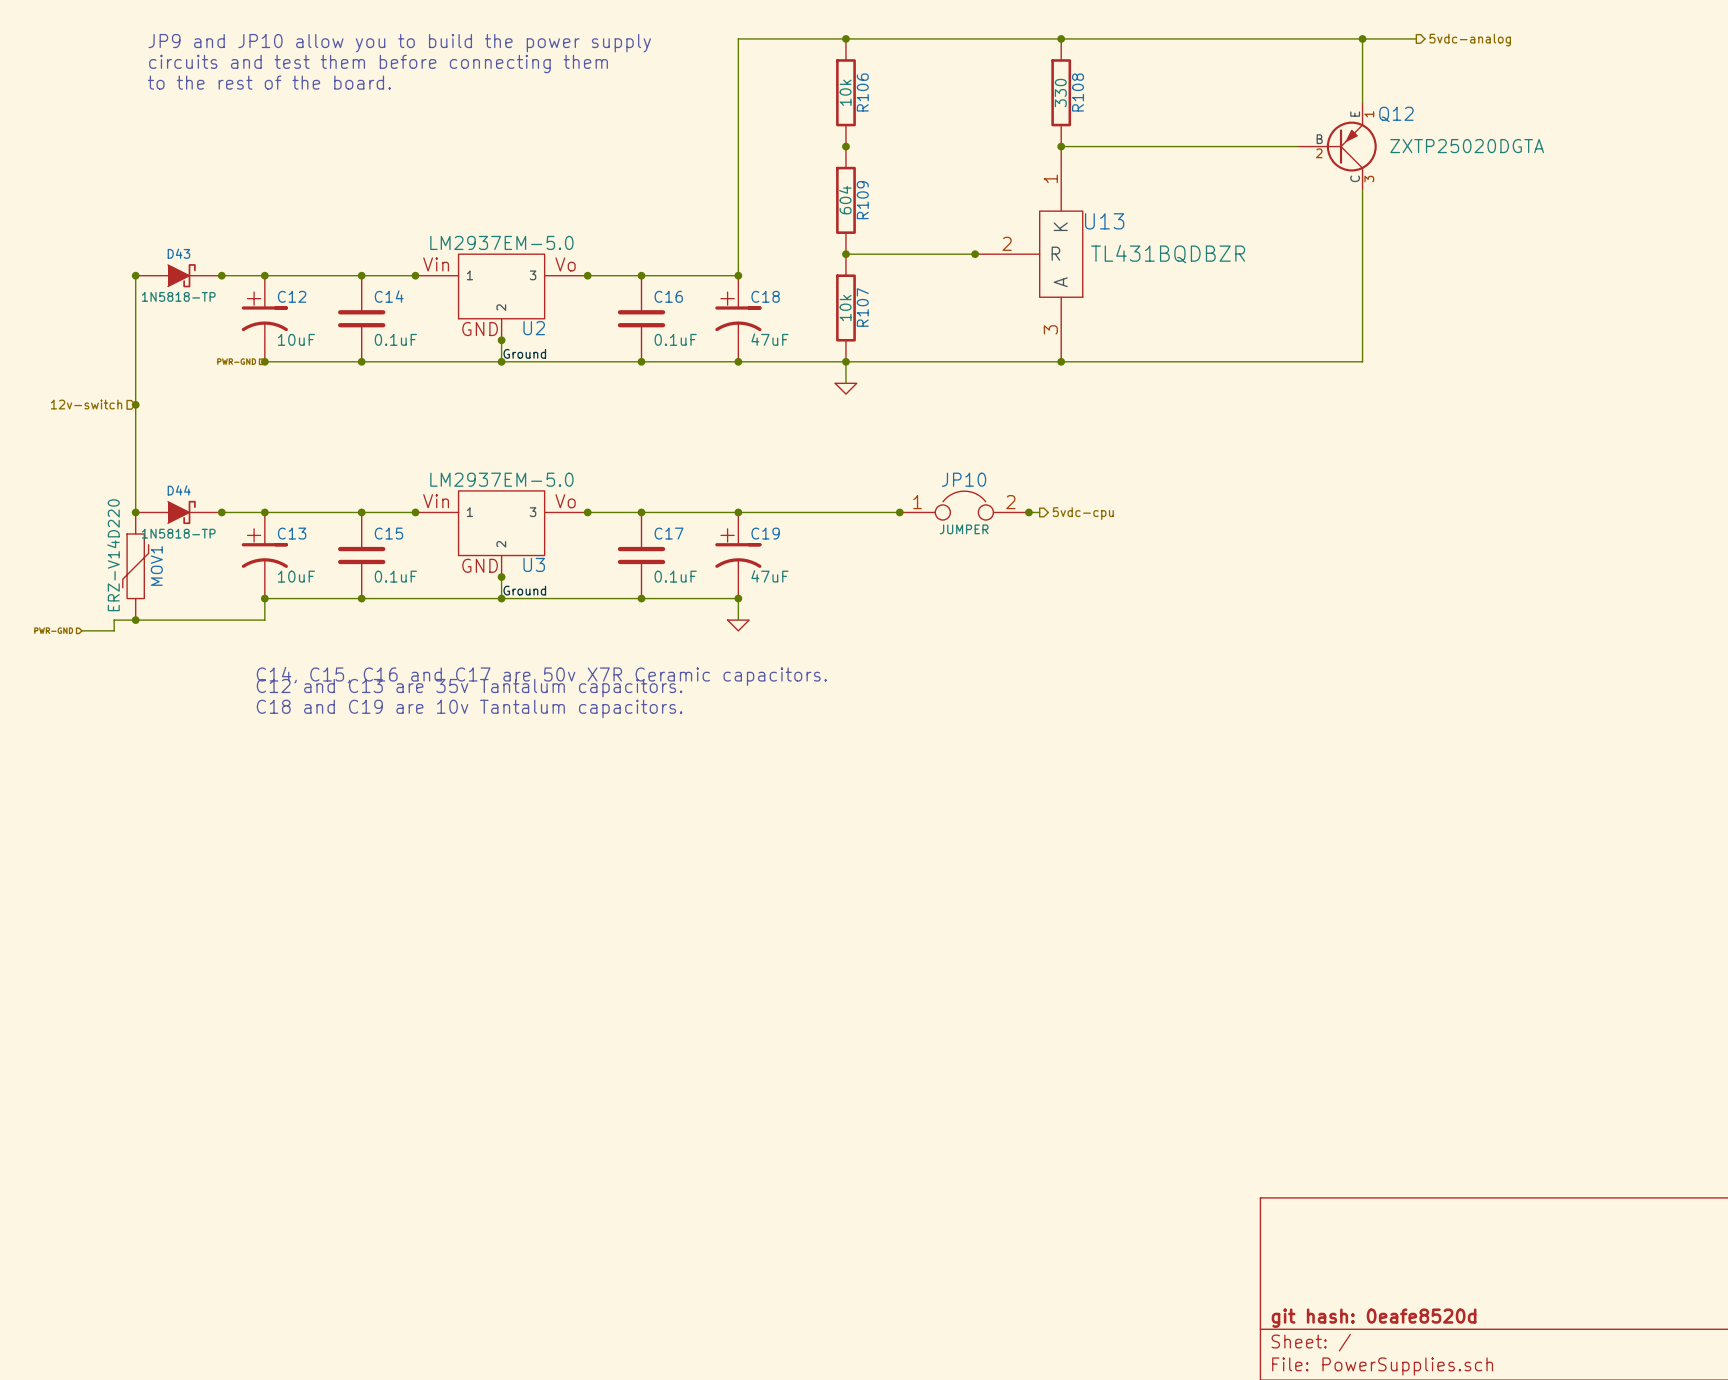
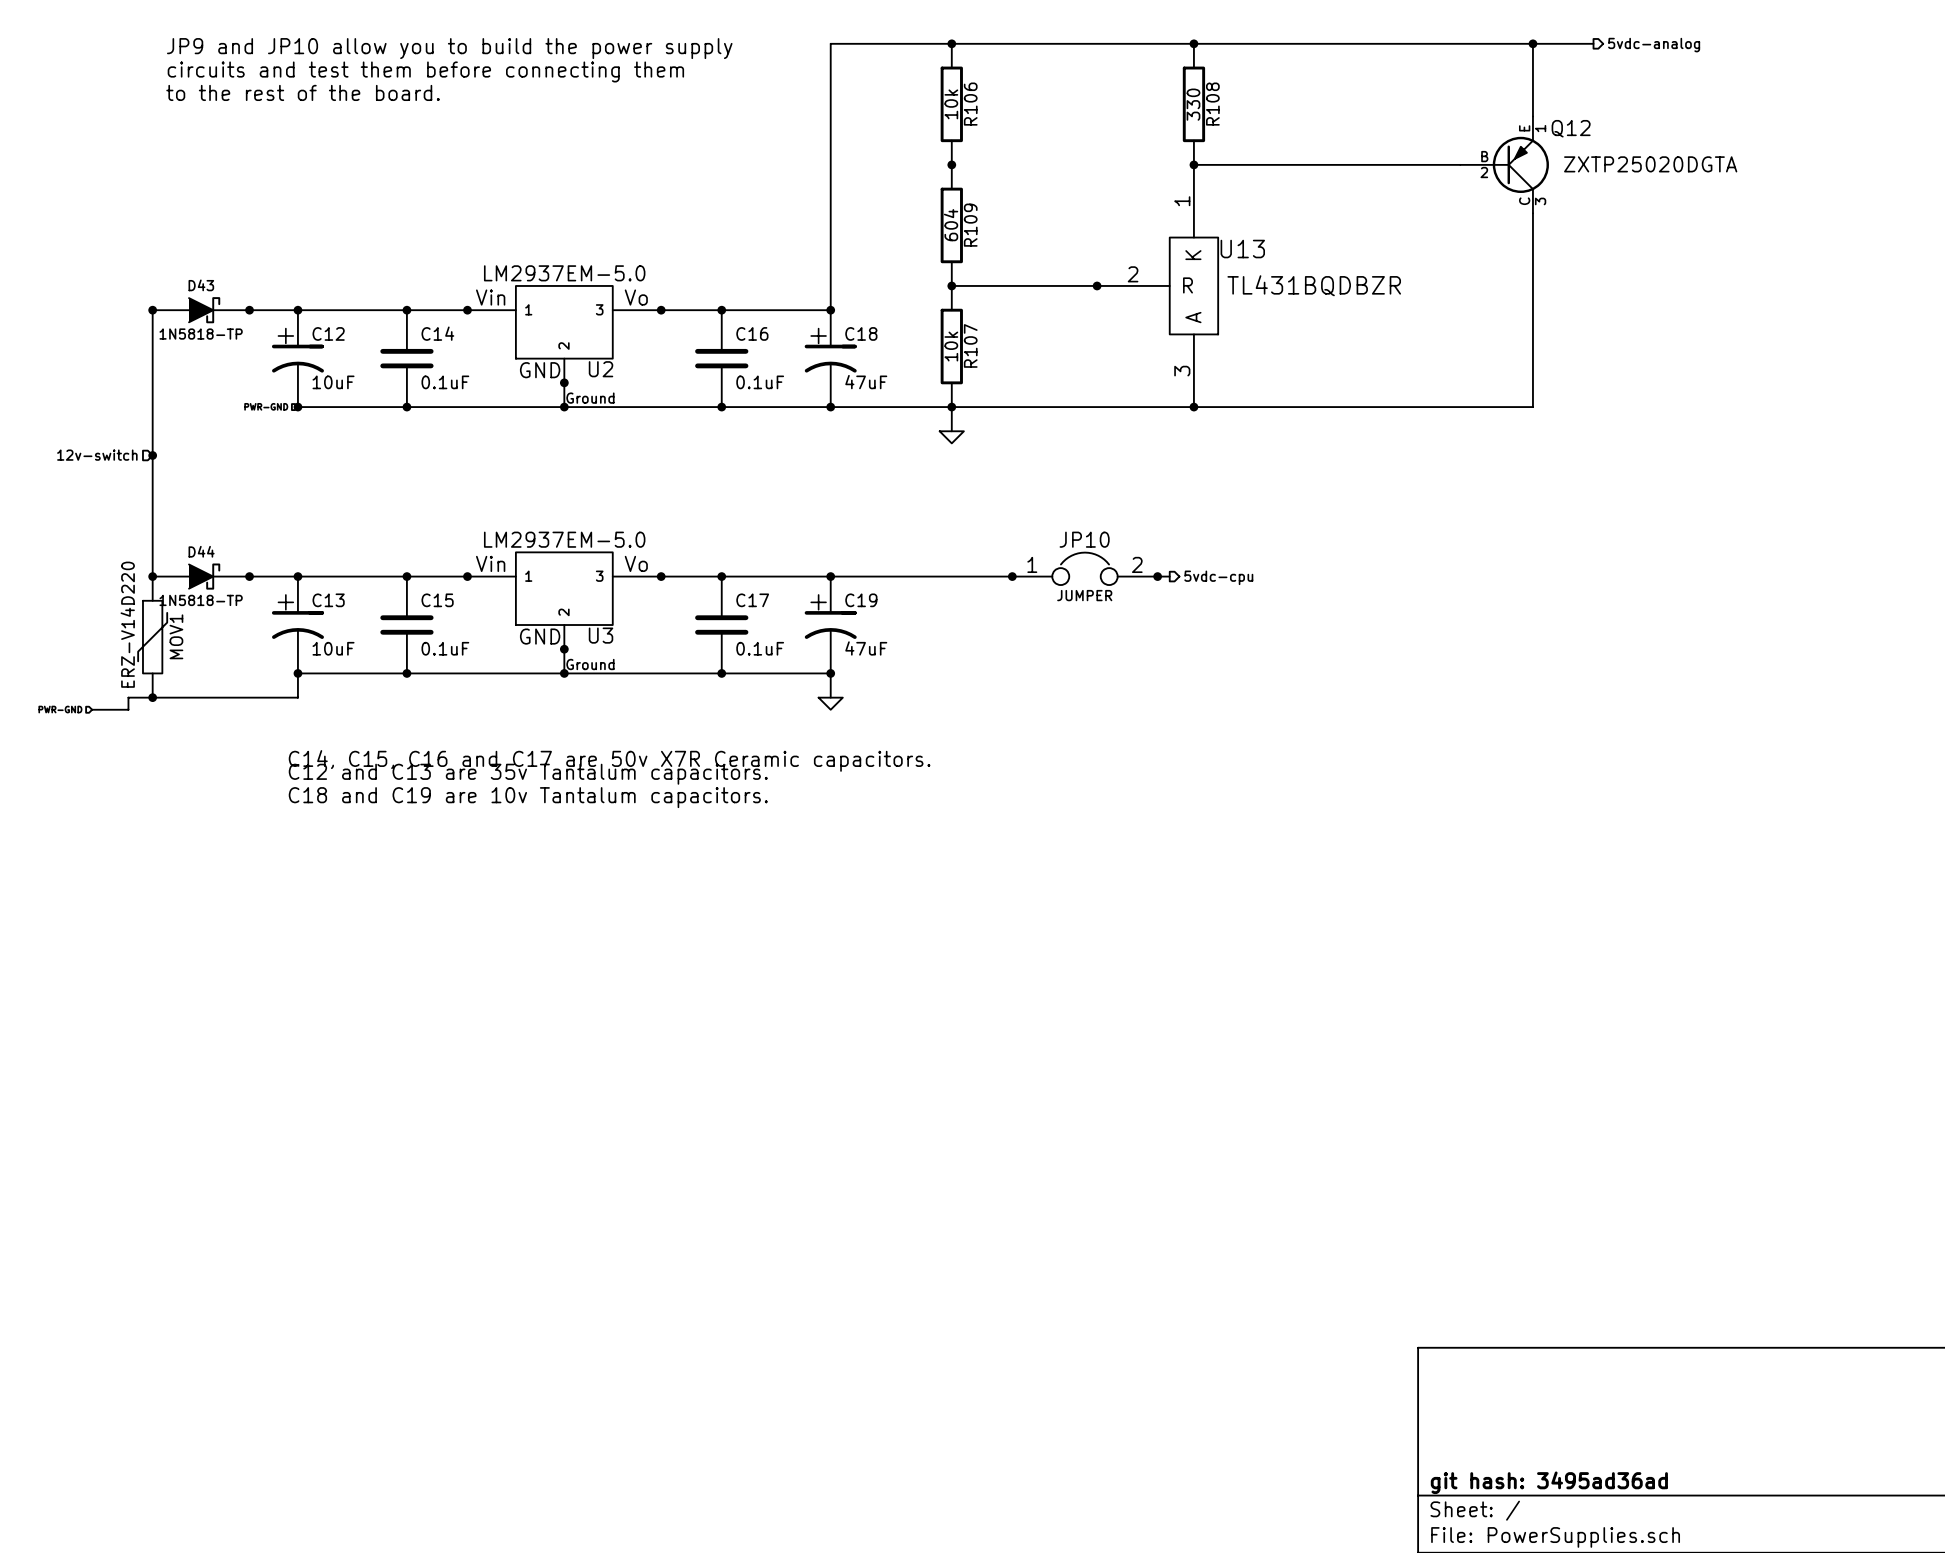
title block: git hash: 0eafe8520d (1374, 1318) -> git hash: 3495ad36ad (1549, 1482)

